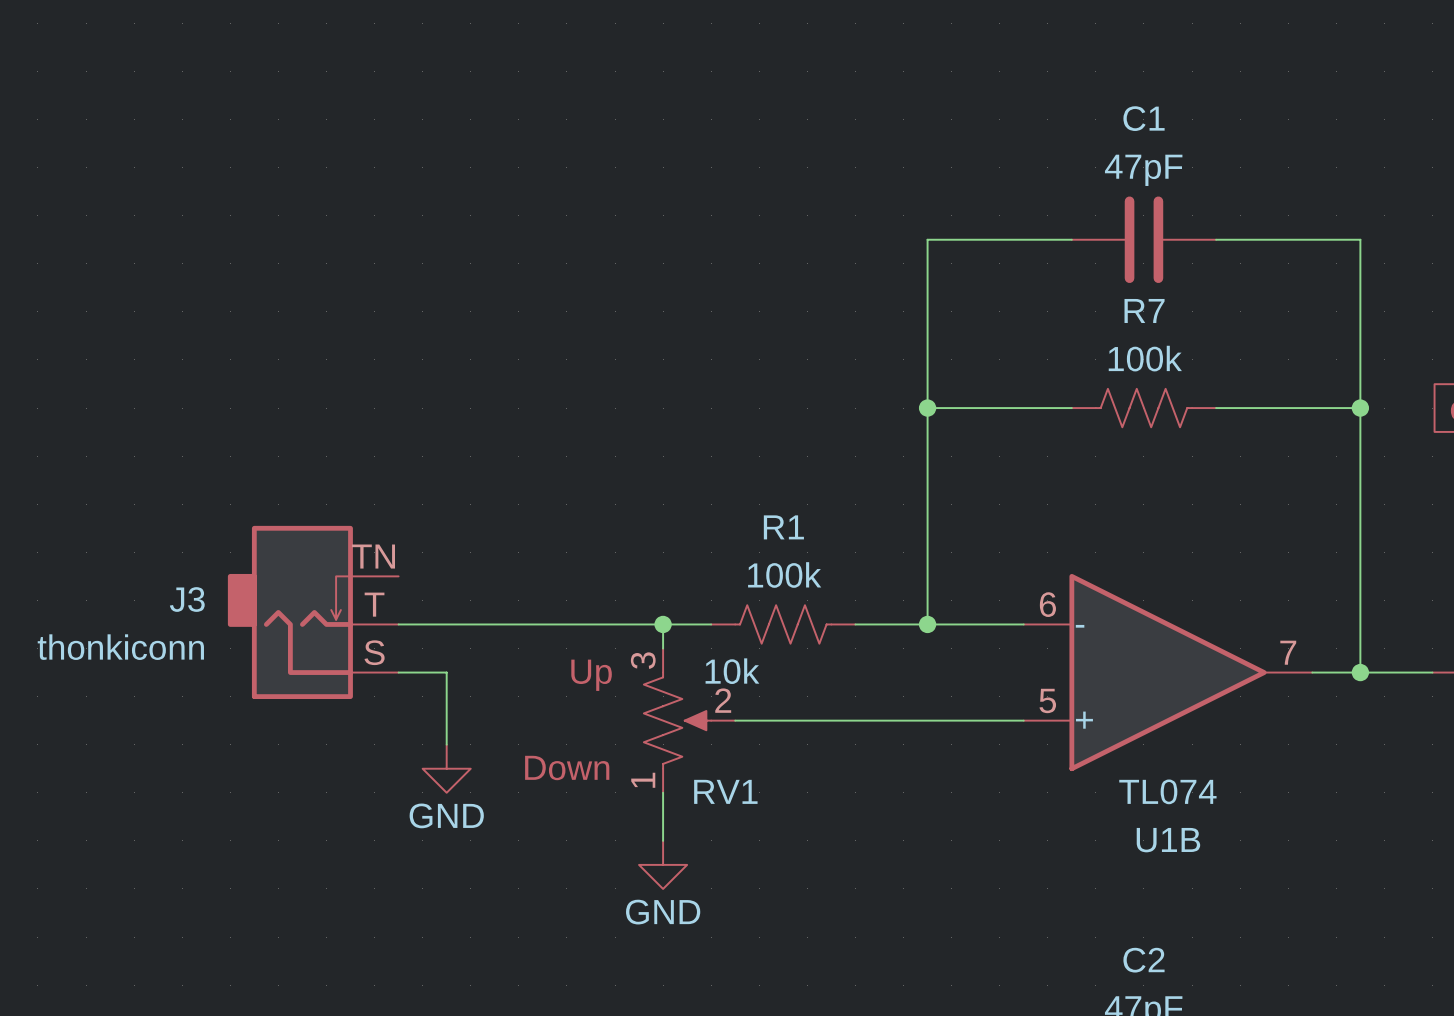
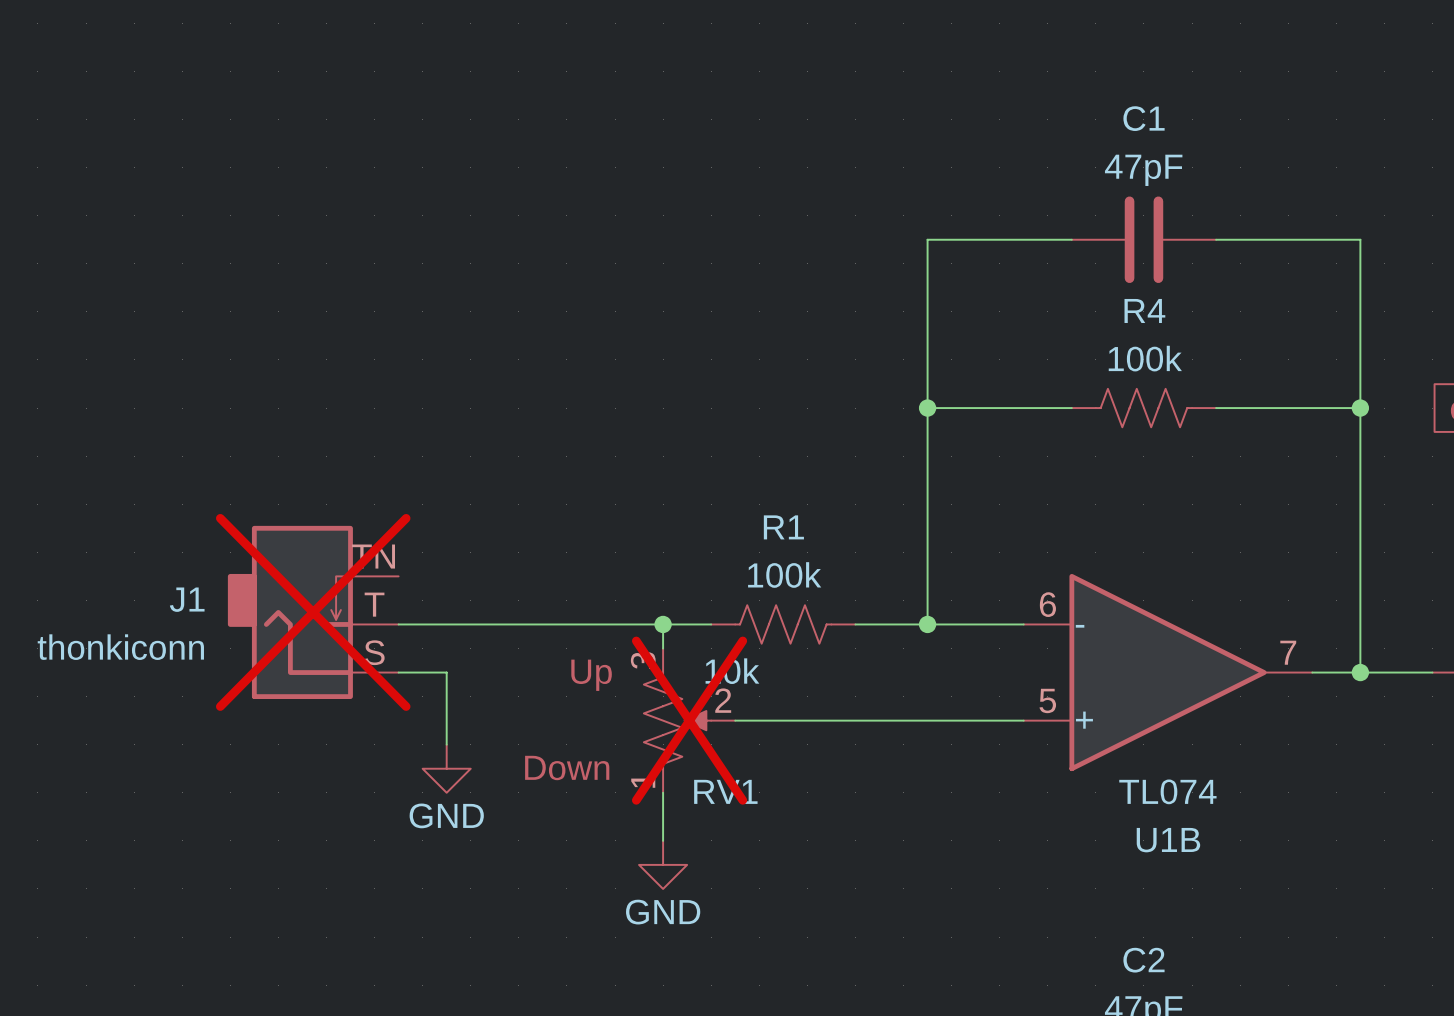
R7 name: R7 (1144, 310) -> R4 (1144, 310)
J3 name: J3 (187, 599) -> J1 (187, 599)
J3 do-not-place cross: none -> (313, 612)
RV1 do-not-place cross: none -> (689, 720)

